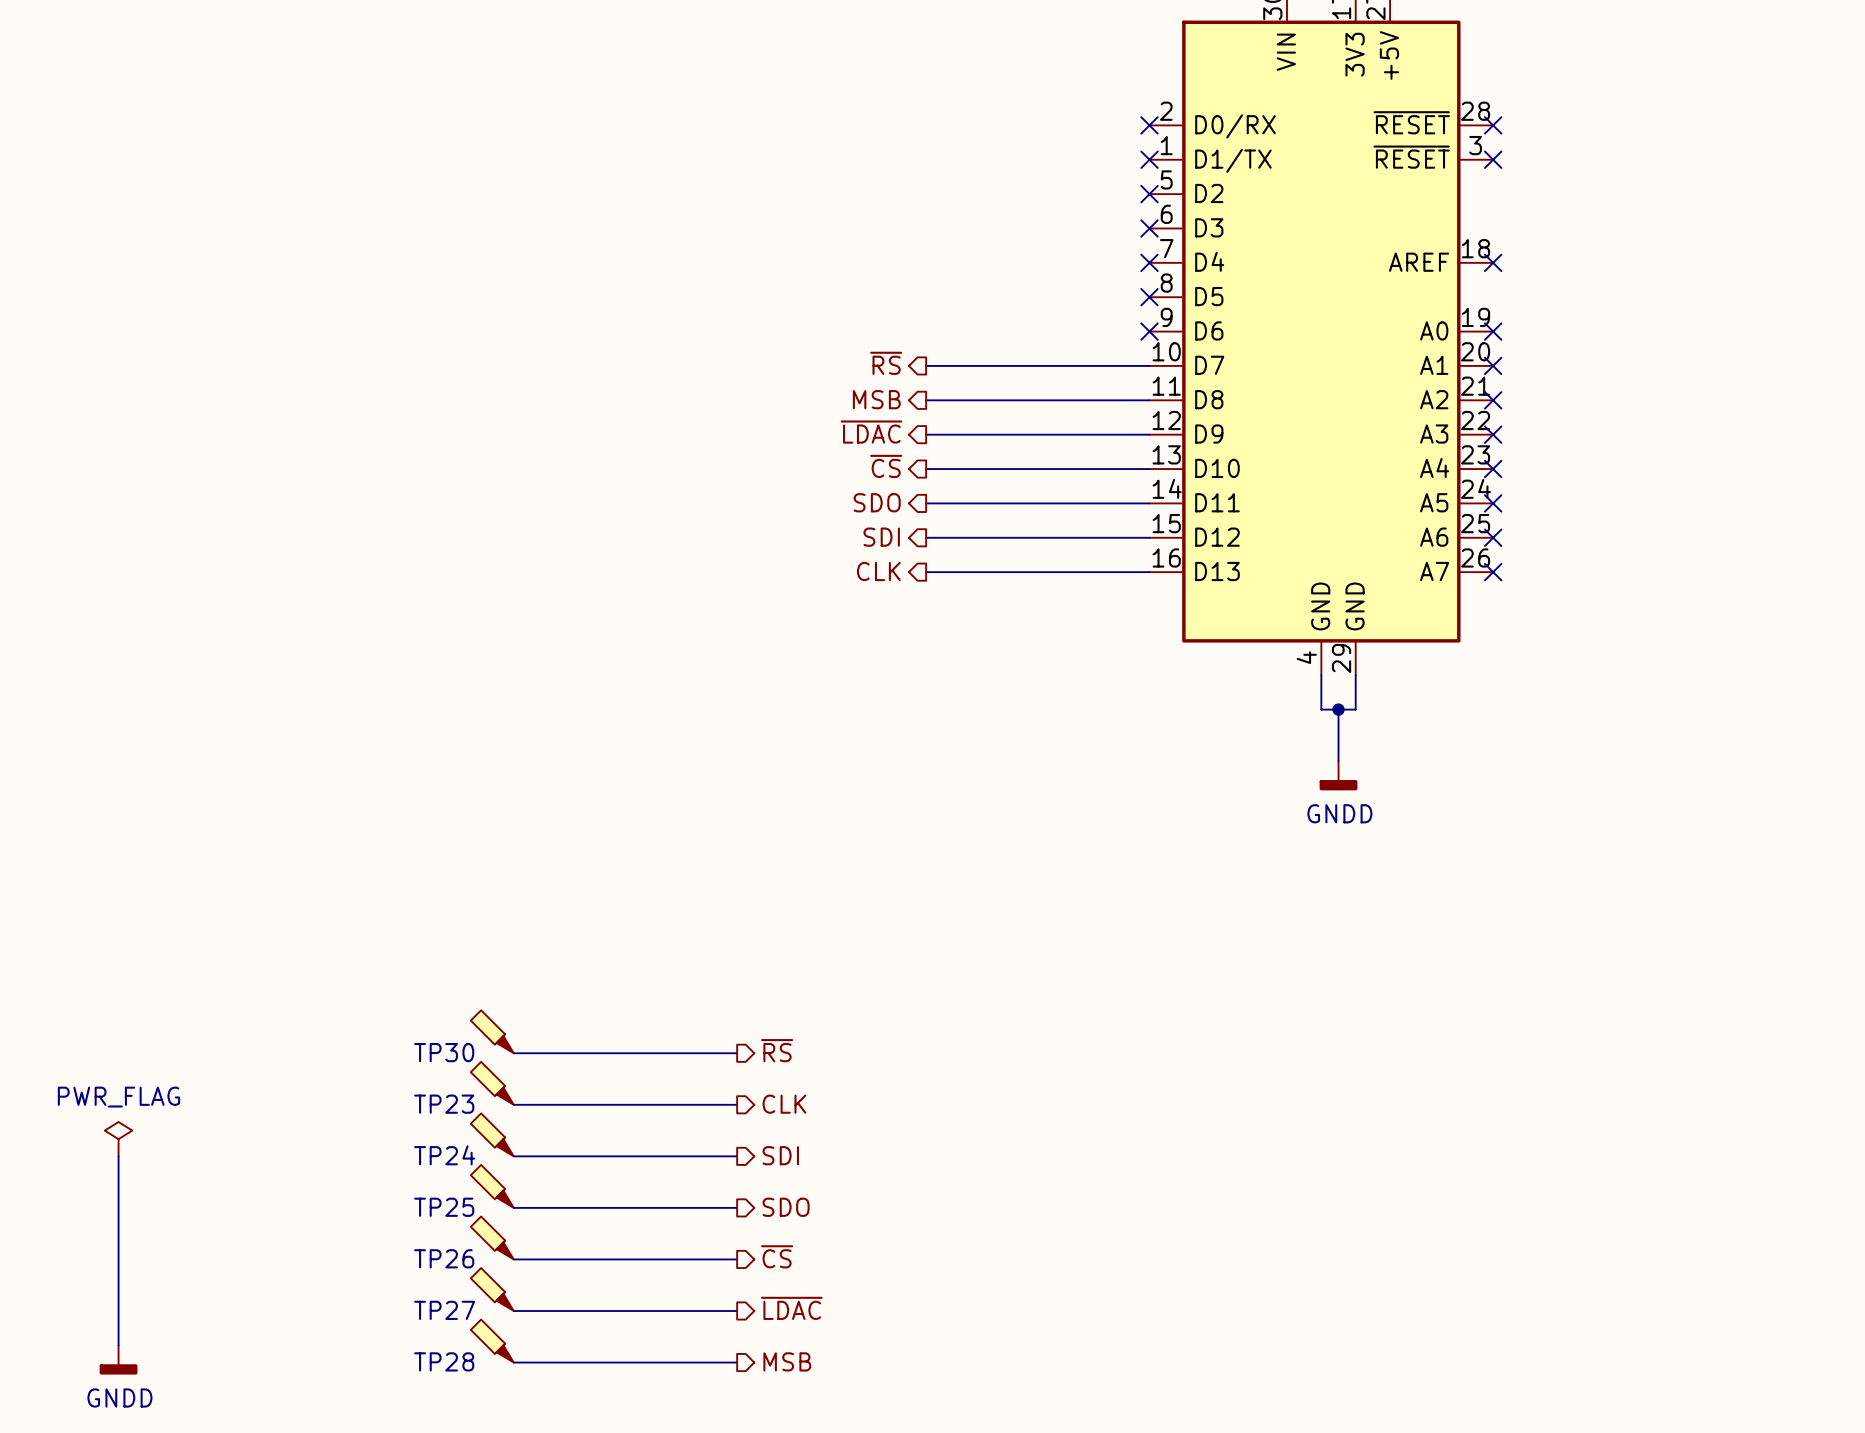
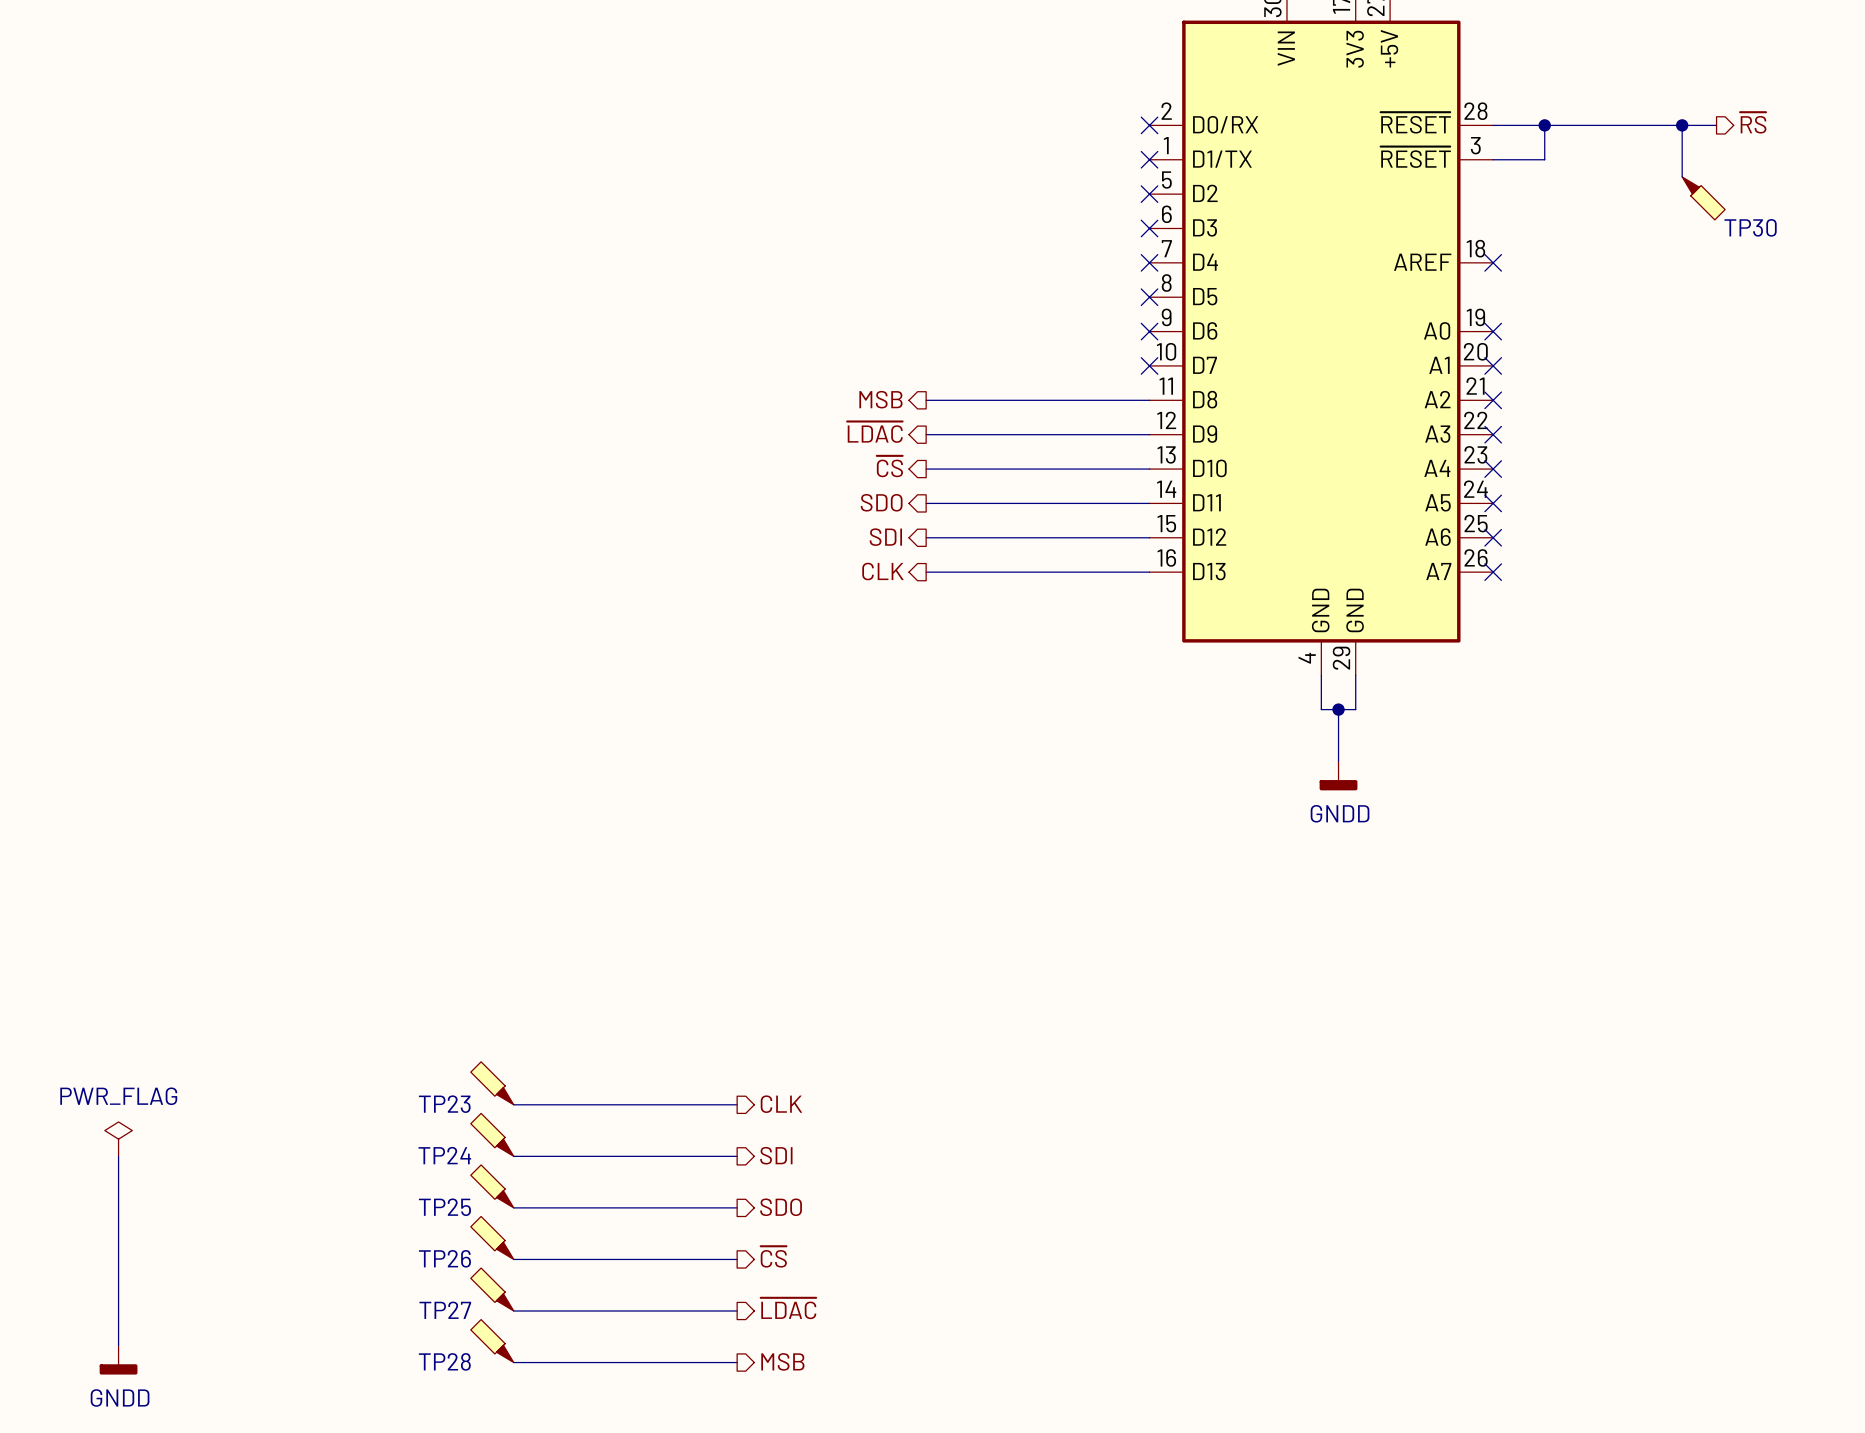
hierarchical label: none -> ~{RS} (1753, 122)
wire: none -> (1493, 125) (1716, 125)
no-connect mark: (1493, 125) -> none
wire: none -> (1544, 125) (1544, 159) (1493, 159)
junction: none -> (1544, 125)
wire: none -> (1682, 125) (1682, 176)
junction: none -> (1682, 125)
no-connect mark: (1493, 159) -> none
hierarchical label: ~{RS} (886, 363) -> none
wire: (926, 365) (1149, 365) -> none
no-connect mark: none -> (1149, 365)
TP30 rotation: 0° (492, 1031) -> 180° (1703, 198)
TP30 position: (492, 1031) -> (1703, 198)
hierarchical label: ~{RS} (777, 1050) -> none
TP30 name position: TP30 (444, 1052) -> TP30 (1750, 227)
wire: (513, 1053) (737, 1053) -> none

